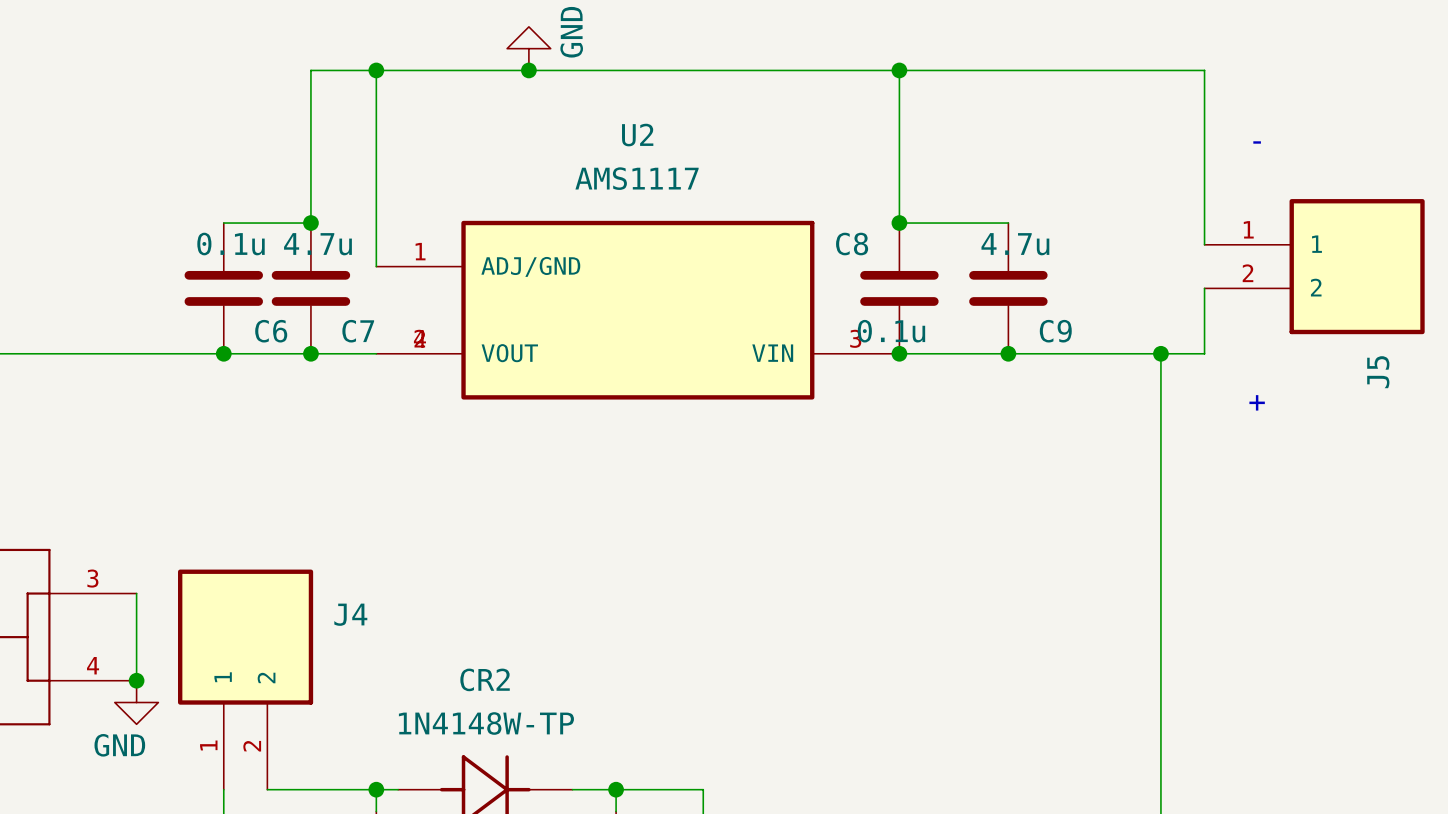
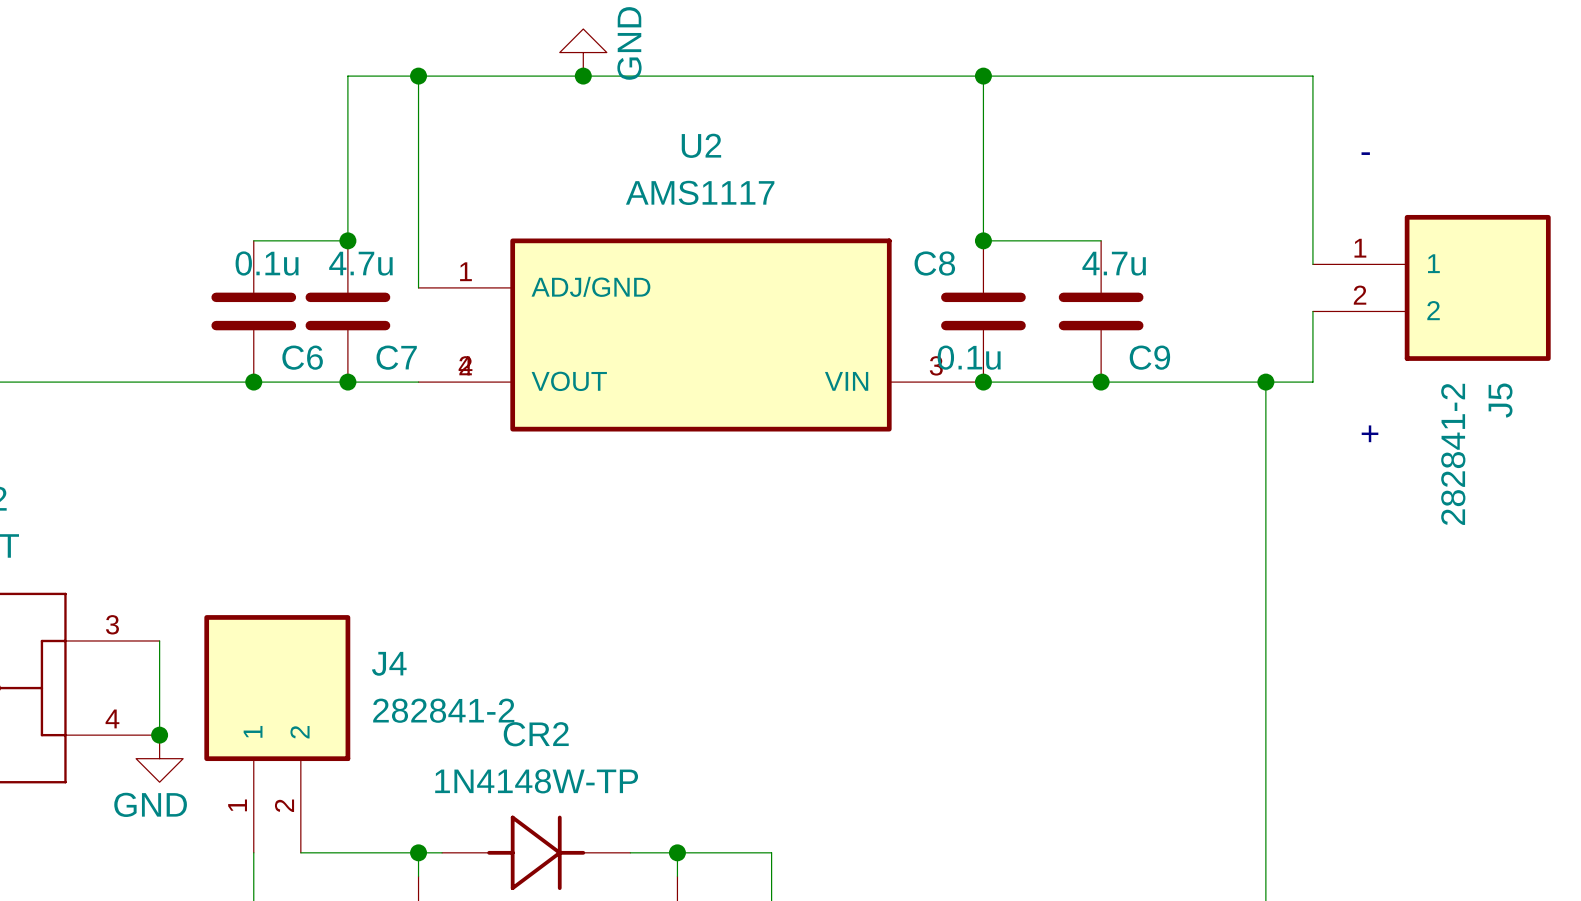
J5 value: none -> 282841-2 (1453, 454)
J4 value: none -> 282841-2 (443, 710)

